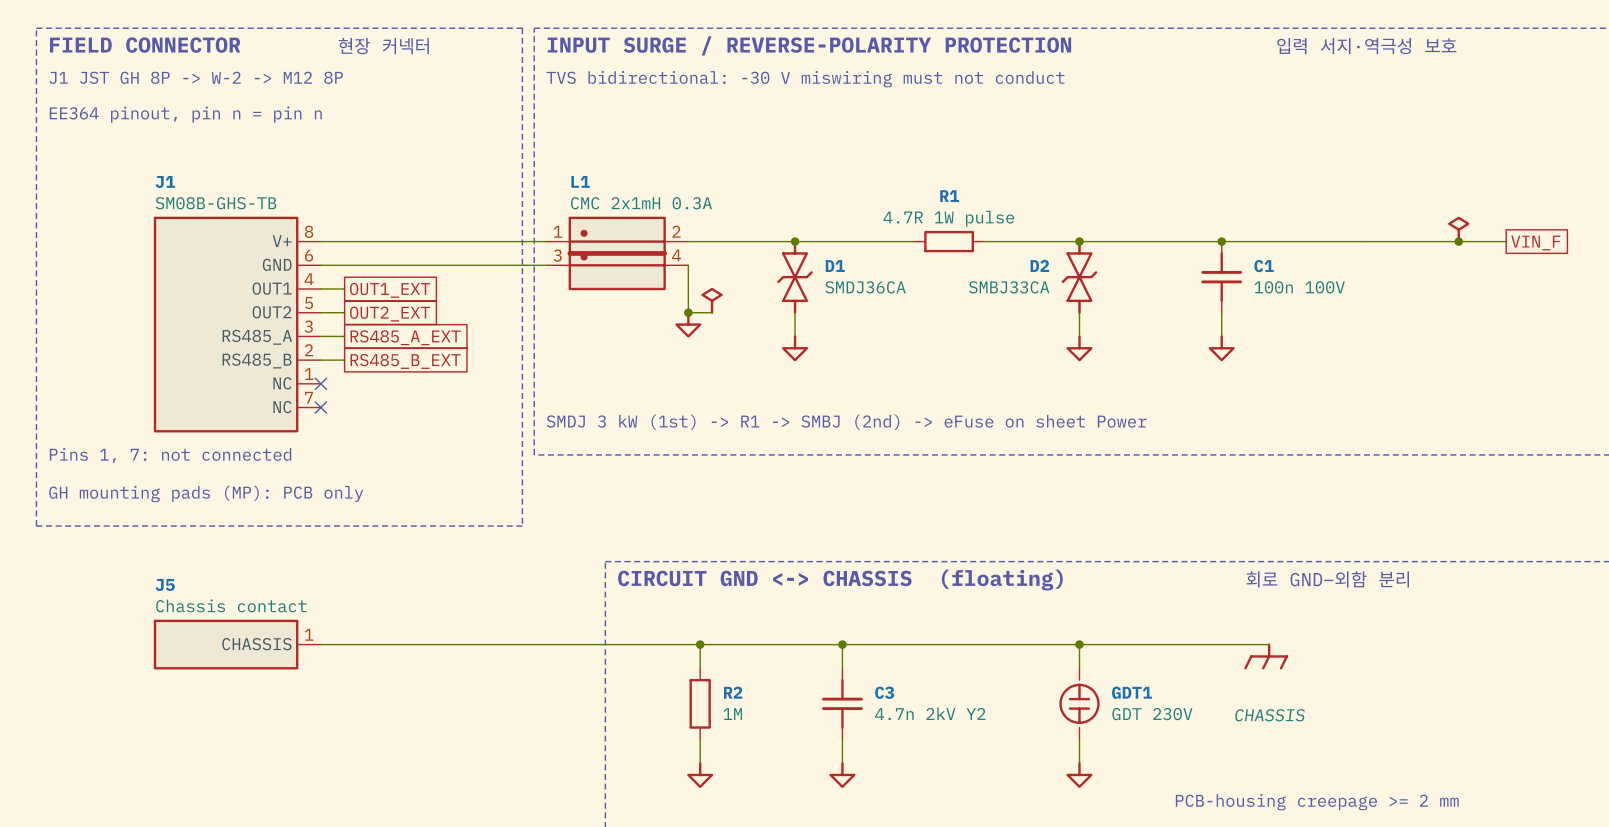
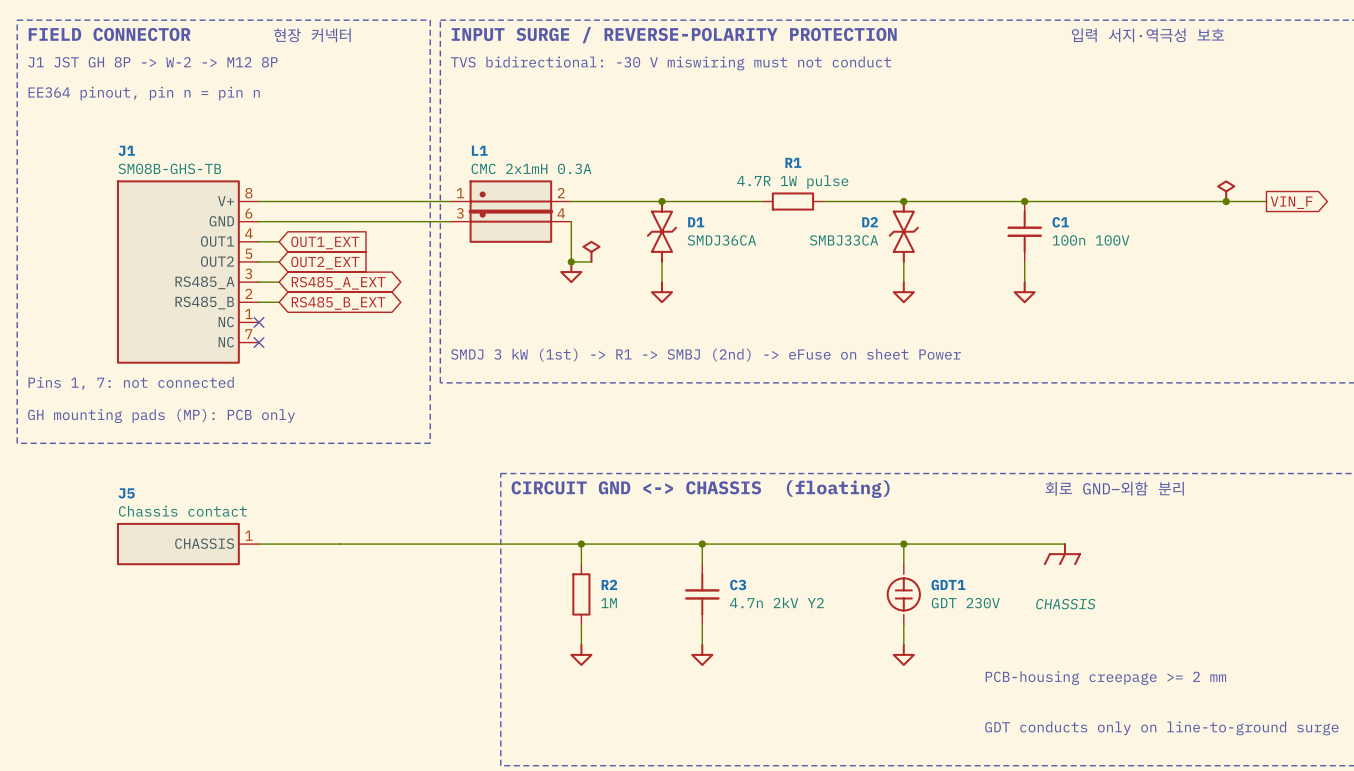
global label shape: passive (1535, 243) -> output (1291, 202)
global label shape: passive (390, 290) -> input (325, 242)
global label shape: passive (390, 314) -> input (325, 263)
global label shape: passive (405, 337) -> bidirectional (338, 283)
global label shape: passive (405, 361) -> bidirectional (338, 303)

